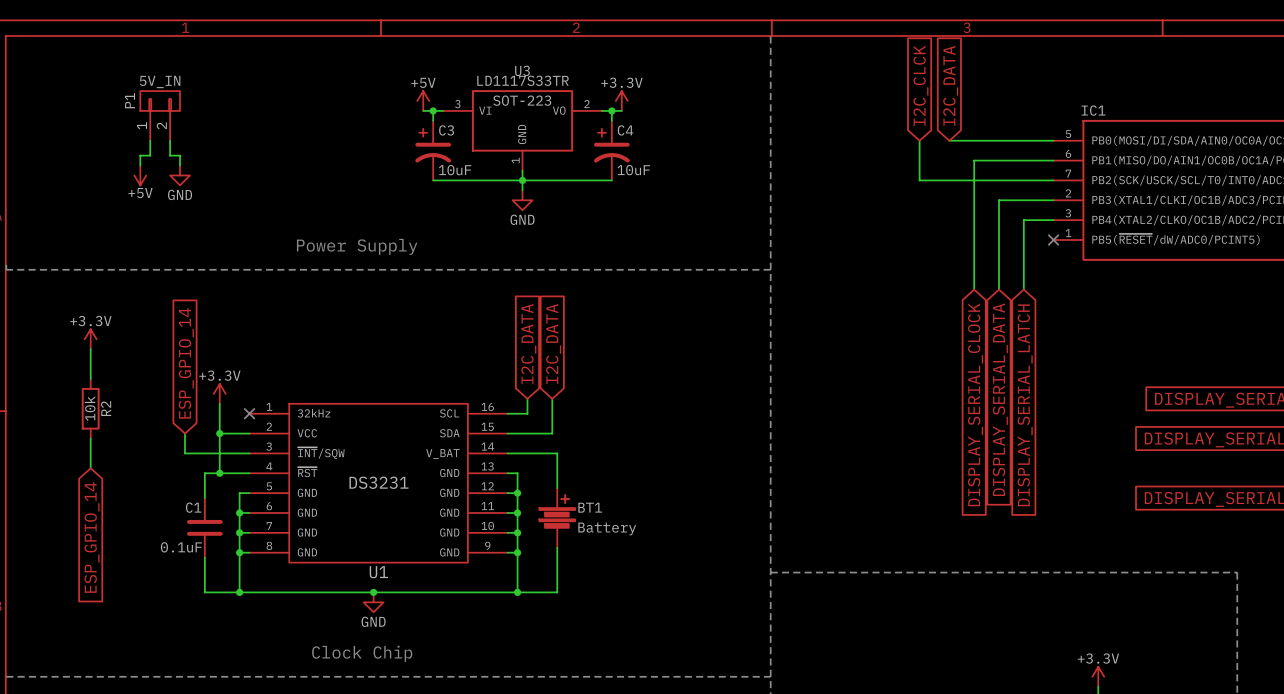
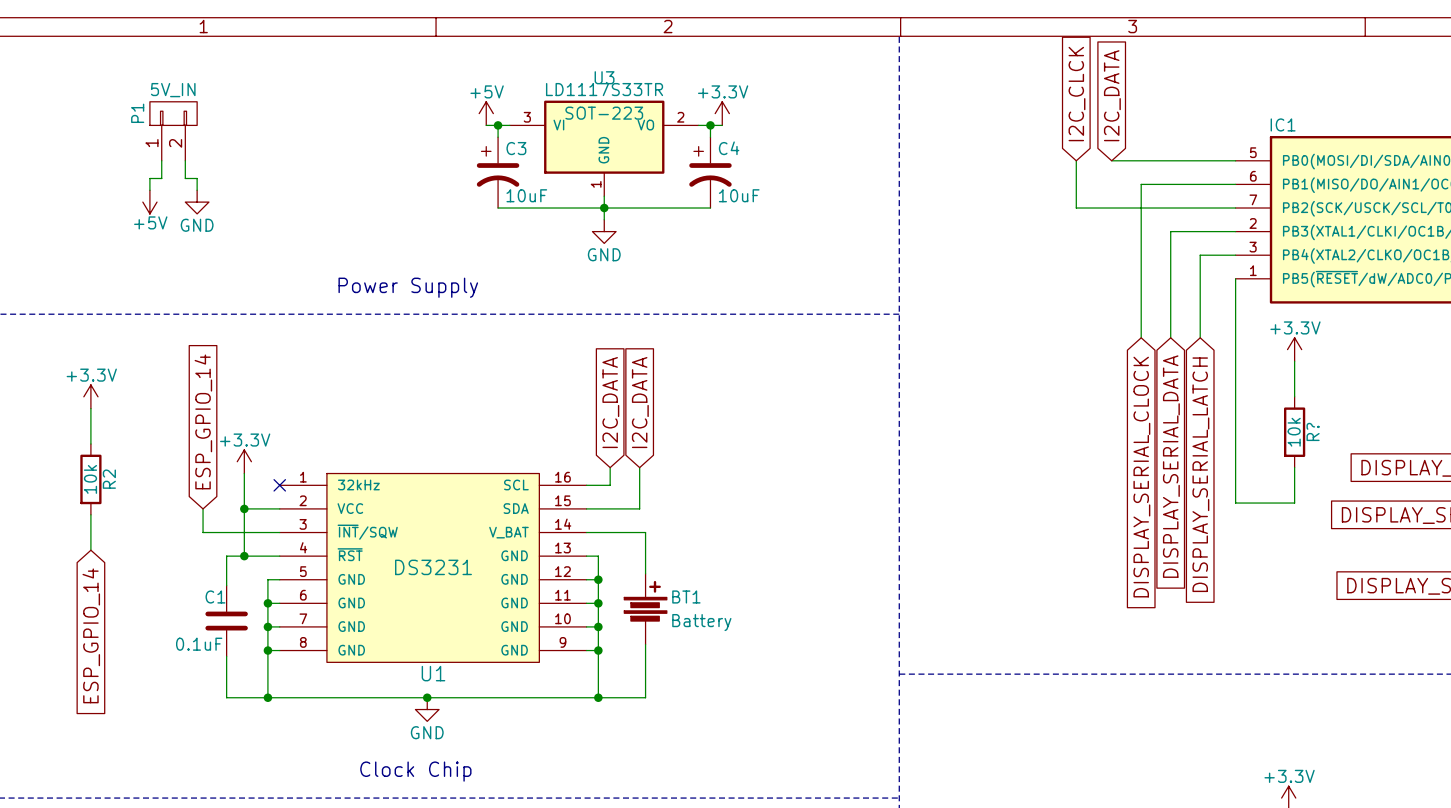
wire: none -> (1235, 278) (1235, 503) (1294, 503) (1294, 467)
no-connect mark: (1053, 240) -> none
power symbol: none -> +3.3V (1294, 349)
wire: none -> (1294, 361) (1294, 396)
R?: none -> 10k (1294, 432)

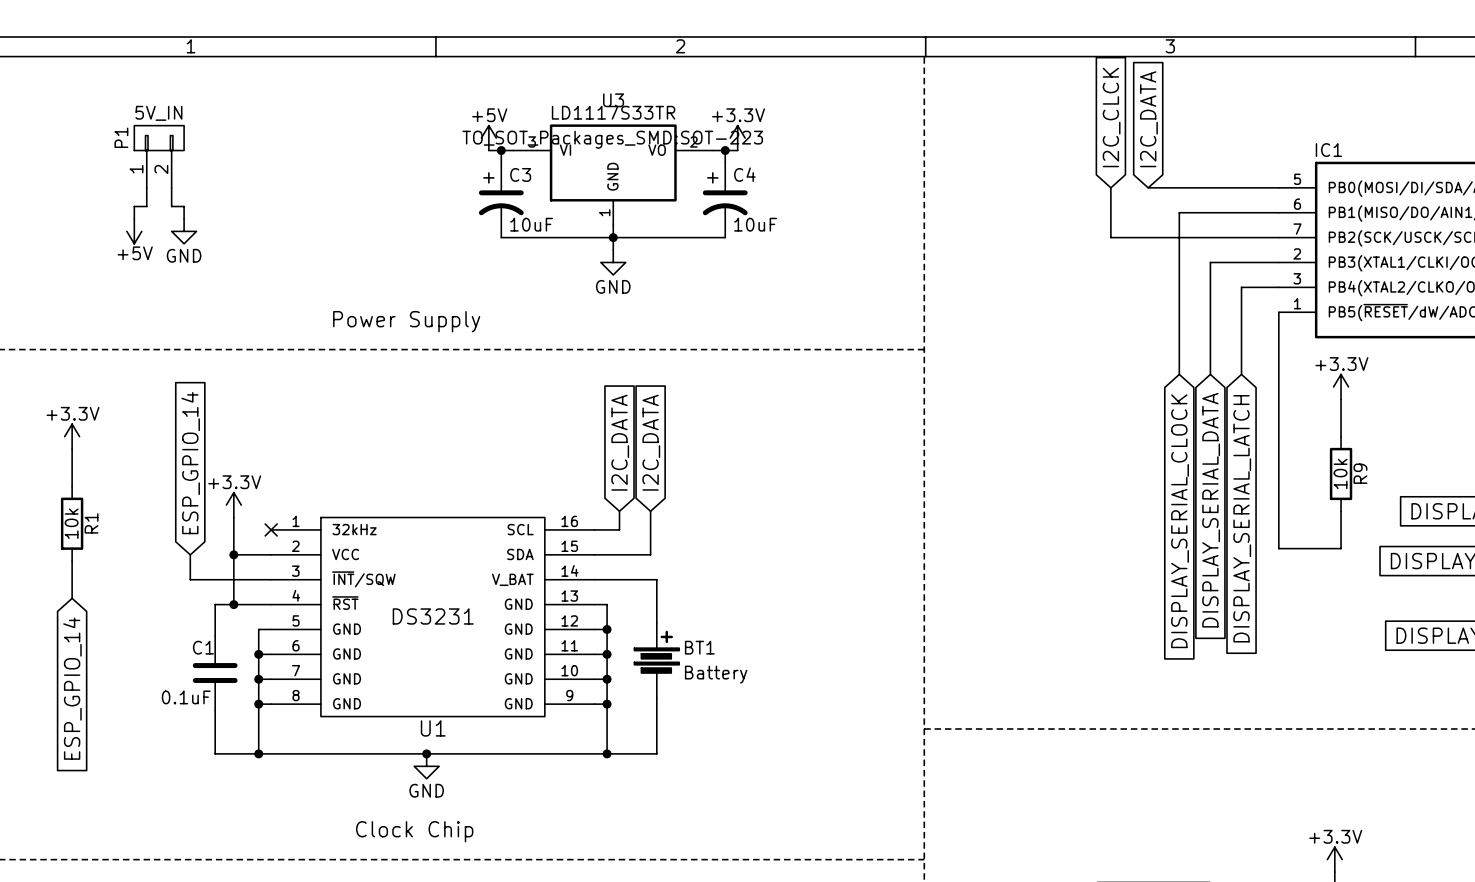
U3 text: SOT-223 (604, 113) -> TO_SOT_Packages_SMD:SOT-223 (612, 139)
R? name: R? (1313, 431) -> R9 (1360, 473)
R2 name: R2 (109, 479) -> R1 (91, 523)

